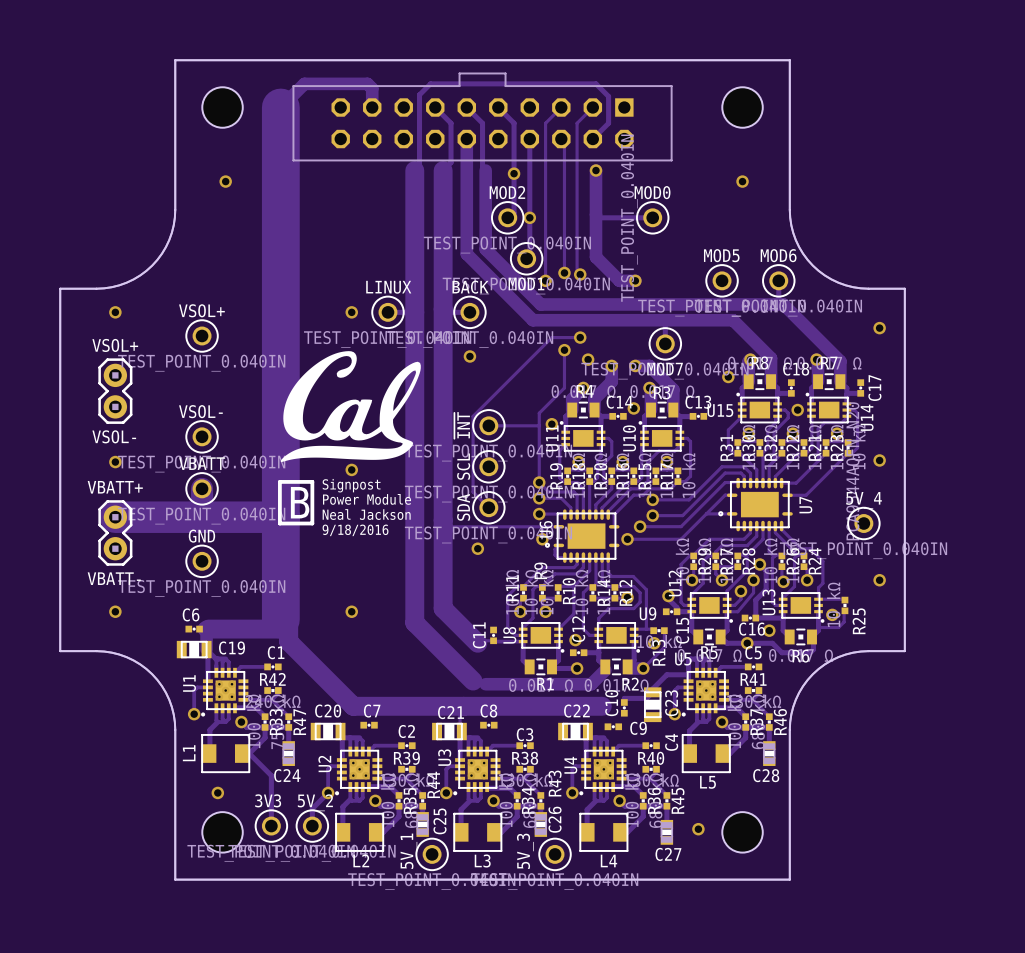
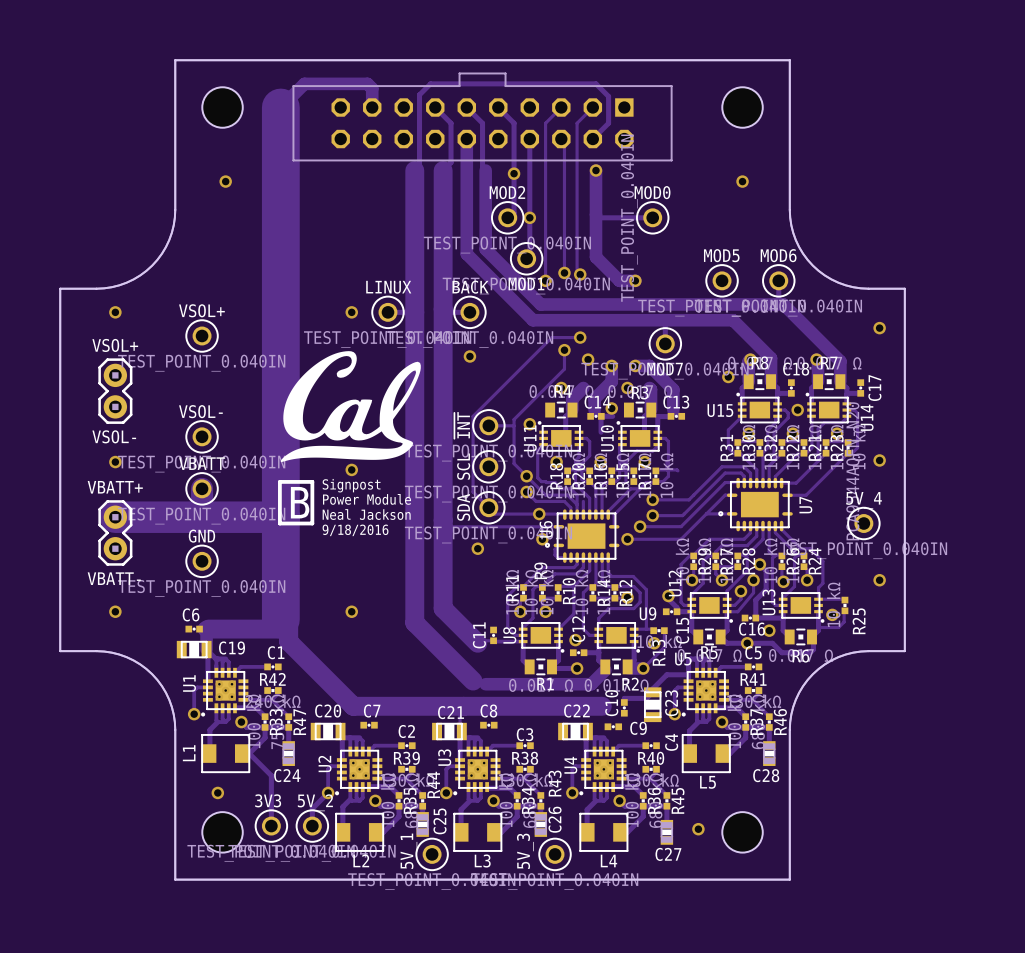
track: (564, 369) (564, 387) (539, 413) (539, 482) (548, 491) (573, 491) -> (564, 369) (514, 419) (514, 463) (545, 495) (567, 495) (577, 504)
via: none -> (561, 387)
via: (583, 387) -> none
via: none -> (627, 387)
via: (649, 387) -> none
via: none -> (611, 408)
via: (633, 408) -> none
R4 position: (583, 410) -> (561, 410)
R3 position: (662, 410) -> (640, 410)
C14 position: (618, 416) -> (595, 416)
track: (693, 416) (679, 416) (679, 432) -> (670, 416) (657, 416) (657, 432)
C13 position: (698, 416) -> (676, 416)
via: none -> (529, 424)
via: (551, 424) -> none
track: (514, 425) (539, 425) -> none
U11 position: (582, 436) -> (560, 436)
U10 position: (661, 436) -> (639, 436)
track: (601, 438) (608, 438) (611, 441) (611, 455) (603, 463) (603, 479) (606, 481) (611, 481) (611, 488) (595, 504) -> (579, 438) (586, 438) (589, 441) (589, 455) (581, 463) (581, 479) (584, 481) (589, 481) (595, 487) (595, 504)
track: none -> (657, 438) (665, 438) (668, 441) (668, 476) (663, 481) (647, 482)
track: (679, 438) (687, 438) (690, 441) (690, 476) (685, 481) (677, 481) (670, 488) (649, 488) (643, 495) (633, 495) -> (640, 488) (633, 495)
track: none -> (543, 444) (537, 450) (537, 477) (541, 481) (555, 482) (561, 488) (570, 488) (573, 491)
track: (565, 444) (559, 450) (559, 477) (563, 481) (577, 482) (583, 488) (583, 501) -> none
track: (601, 444) (601, 456) (597, 460) (597, 477) (593, 481) (589, 481) -> none
track: (644, 444) (641, 447) (641, 477) (637, 481) (627, 482) (602, 507) -> (622, 444) (619, 447) (619, 477) (615, 481) (605, 482) (602, 485) (602, 507)
track: none -> (657, 444) (652, 451) (636, 451) (625, 462) (625, 482)
track: (679, 444) (674, 451) (659, 451) (647, 462) (647, 482) (655, 481) -> none
via: none -> (556, 462)
via: (578, 462) -> none
via: none -> (600, 462)
via: (622, 462) -> none
via: none -> (644, 462)
via: (666, 462) -> none
via: none -> (526, 476)
R19 name: R19 (556, 476) -> R18 (556, 476)
R18 name: R18 (578, 476) -> R20 (578, 476)
R20 name: R20 (600, 476) -> R16 (600, 476)
R16 name: R16 (622, 476) -> R15 (622, 476)
R15 name: R15 (644, 476) -> R17 (644, 476)
R17: 10 kΩ (677, 476) -> none
track: (589, 481) (589, 498) -> (579, 444) (579, 456) (575, 460) (575, 484) (589, 498)
via: (539, 482) -> none
via: none -> (526, 491)
track: (539, 498) (561, 498) (564, 501) -> (526, 491) (536, 501) (564, 501)
via: (539, 498) -> none
track: none -> (488, 507) (495, 514) (539, 514)

